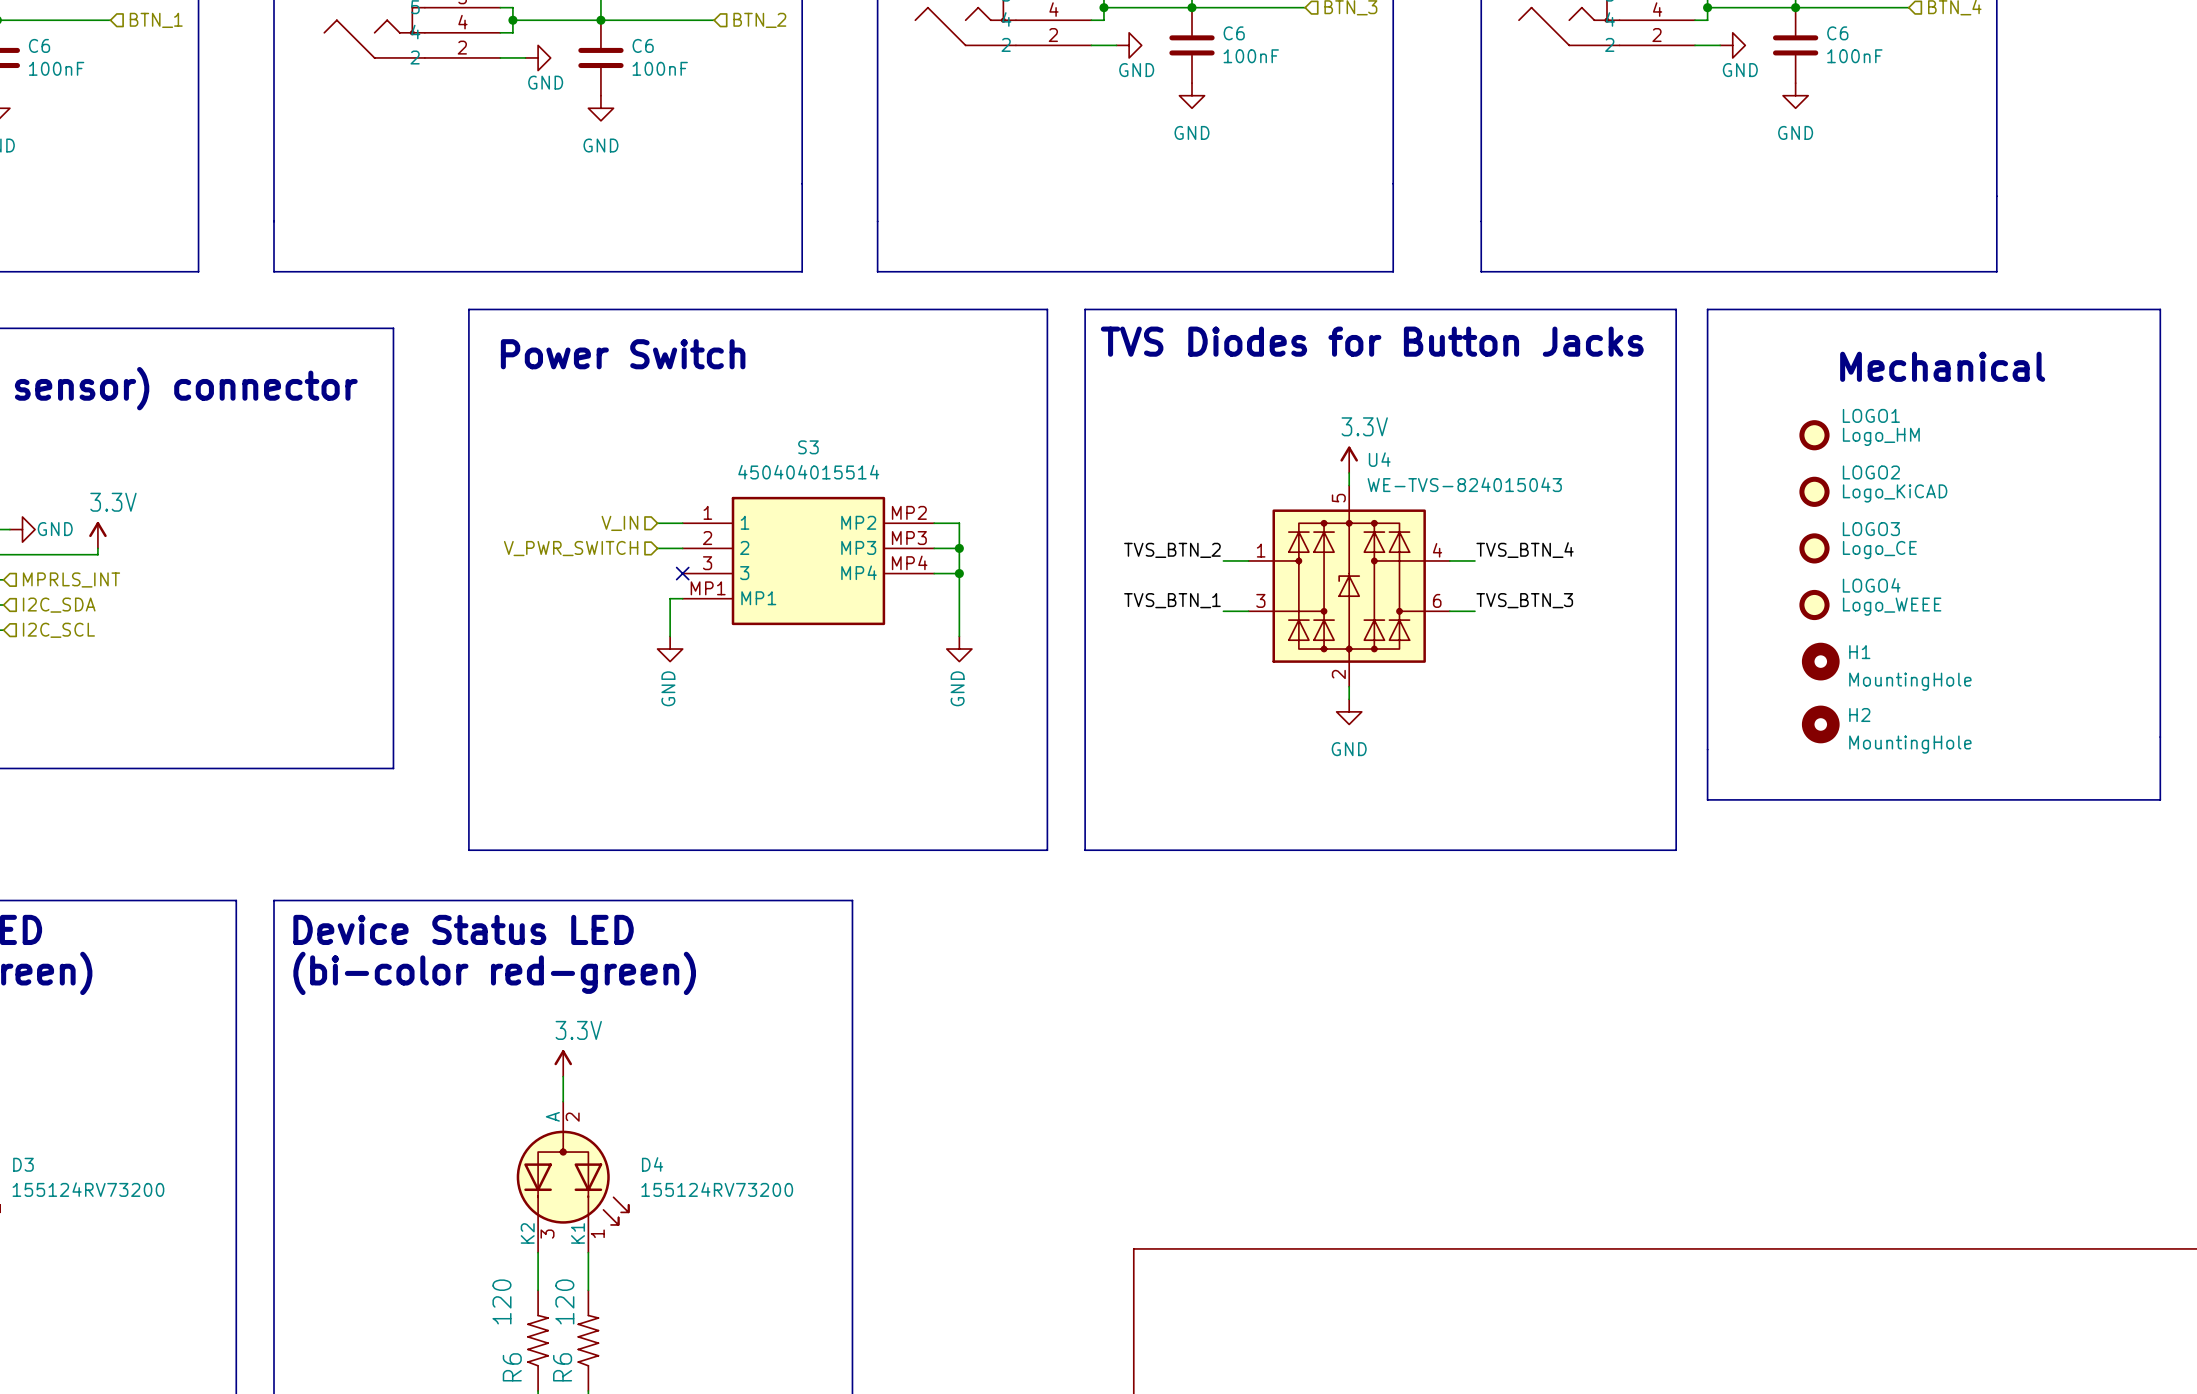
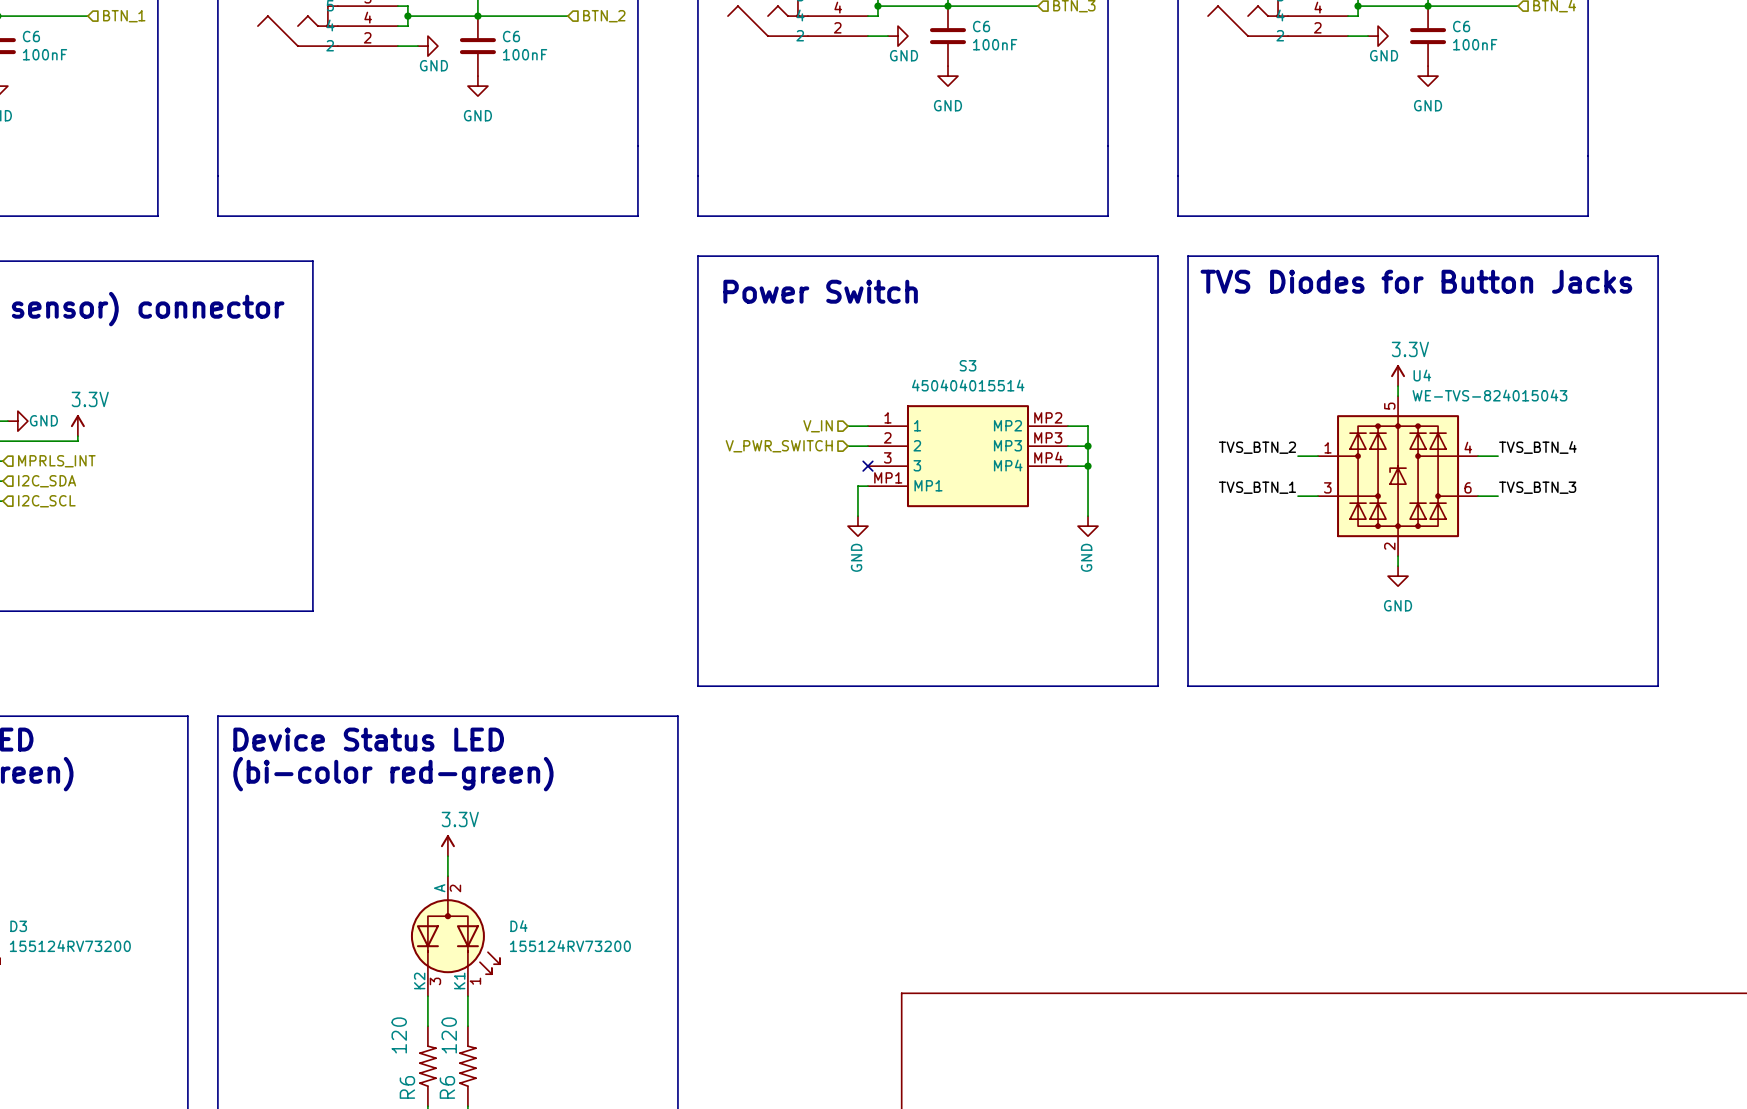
line: (468, 309) (1047, 309) (1047, 850) (468, 850) (468, 309) -> none
line: (1085, 309) (1676, 309) (1676, 850) (1085, 850) (1085, 309) -> none
line: (1707, 309) (1707, 799) (2160, 799) (2160, 309) (1707, 309) -> none
line: none -> (697, 256) (1158, 256) (1158, 686) (697, 686) (697, 256)
line: none -> (1188, 256) (1658, 256) (1658, 686) (1188, 686) (1188, 256)
text: TVS Diodes for Button Jacks (1372, 341) -> none
text: Power Switch (623, 354) -> none
text: none -> TVS Diodes for Button Jacks (1416, 281)
text: none -> Power Switch (820, 291)
text: Mechanical (1942, 366) -> none
LOGO1: Logo_HM (1814, 435) -> none
power symbol: 3.3V (1349, 459) -> none
wire: (1349, 472) (1349, 485) -> none
power symbol: none -> 3.3V (1398, 375)
wire: none -> (1398, 386) (1398, 396)
LOGO2: Logo_KiCAD (1814, 491) -> none
hierarchical label: V_IN (619, 523) -> none
wire: (657, 523) (682, 523) -> none
wire: (934, 523) (959, 523) (959, 636) -> none
hierarchical label: none -> V_IN (818, 426)
hierarchical label: V_PWR_SWITCH (571, 548) -> none
wire: (657, 548) (682, 548) -> none
wire: (934, 548) (959, 548) -> (847, 426) (867, 426)
junction: (959, 548) -> none
LOGO3: Logo_CE (1814, 548) -> none
label: TVS_BTN_2 (1172, 550) -> none
label: TVS_BTN_4 (1525, 550) -> TVS_BTN_2 (1257, 447)
S3 position: (808, 560) -> (967, 456)
junction: none -> (1088, 446)
wire: (1449, 560) (1474, 560) -> (1298, 456) (1318, 456)
hierarchical label: none -> V_PWR_SWITCH (779, 446)
label: none -> TVS_BTN_4 (1537, 447)
no-connect mark: (682, 573) -> none
wire: (934, 573) (959, 573) -> (847, 446) (867, 446)
junction: (959, 573) -> none
wire: none -> (1478, 456) (1498, 456)
no-connect mark: none -> (867, 466)
U4 position: (1349, 586) -> (1398, 476)
junction: none -> (1088, 466)
wire: (682, 598) (670, 598) (670, 636) -> none
label: TVS_BTN_1 (1172, 600) -> none
label: TVS_BTN_3 (1524, 600) -> TVS_BTN_1 (1257, 487)
LOGO4: Logo_WEEE (1814, 605) -> none
wire: none -> (867, 486) (857, 486) (857, 516)
wire: (1449, 611) (1474, 611) -> (1298, 496) (1318, 496)
label: none -> TVS_BTN_3 (1537, 487)
wire: none -> (1478, 496) (1498, 496)
power symbol: GND (670, 649) -> none
power symbol position: GND (959, 649) -> GND (857, 526)
H1: MountingHole (1820, 661) -> none
wire: (1349, 686) (1349, 699) -> none
wire: none -> (1398, 556) (1398, 566)
power symbol position: GND (1349, 711) -> GND (1088, 526)
power symbol: none -> GND (1398, 576)
H2: MountingHole (1820, 724) -> none
power symbol text rotation: 0° (1349, 749) -> 90° counterclockwise (1086, 557)

